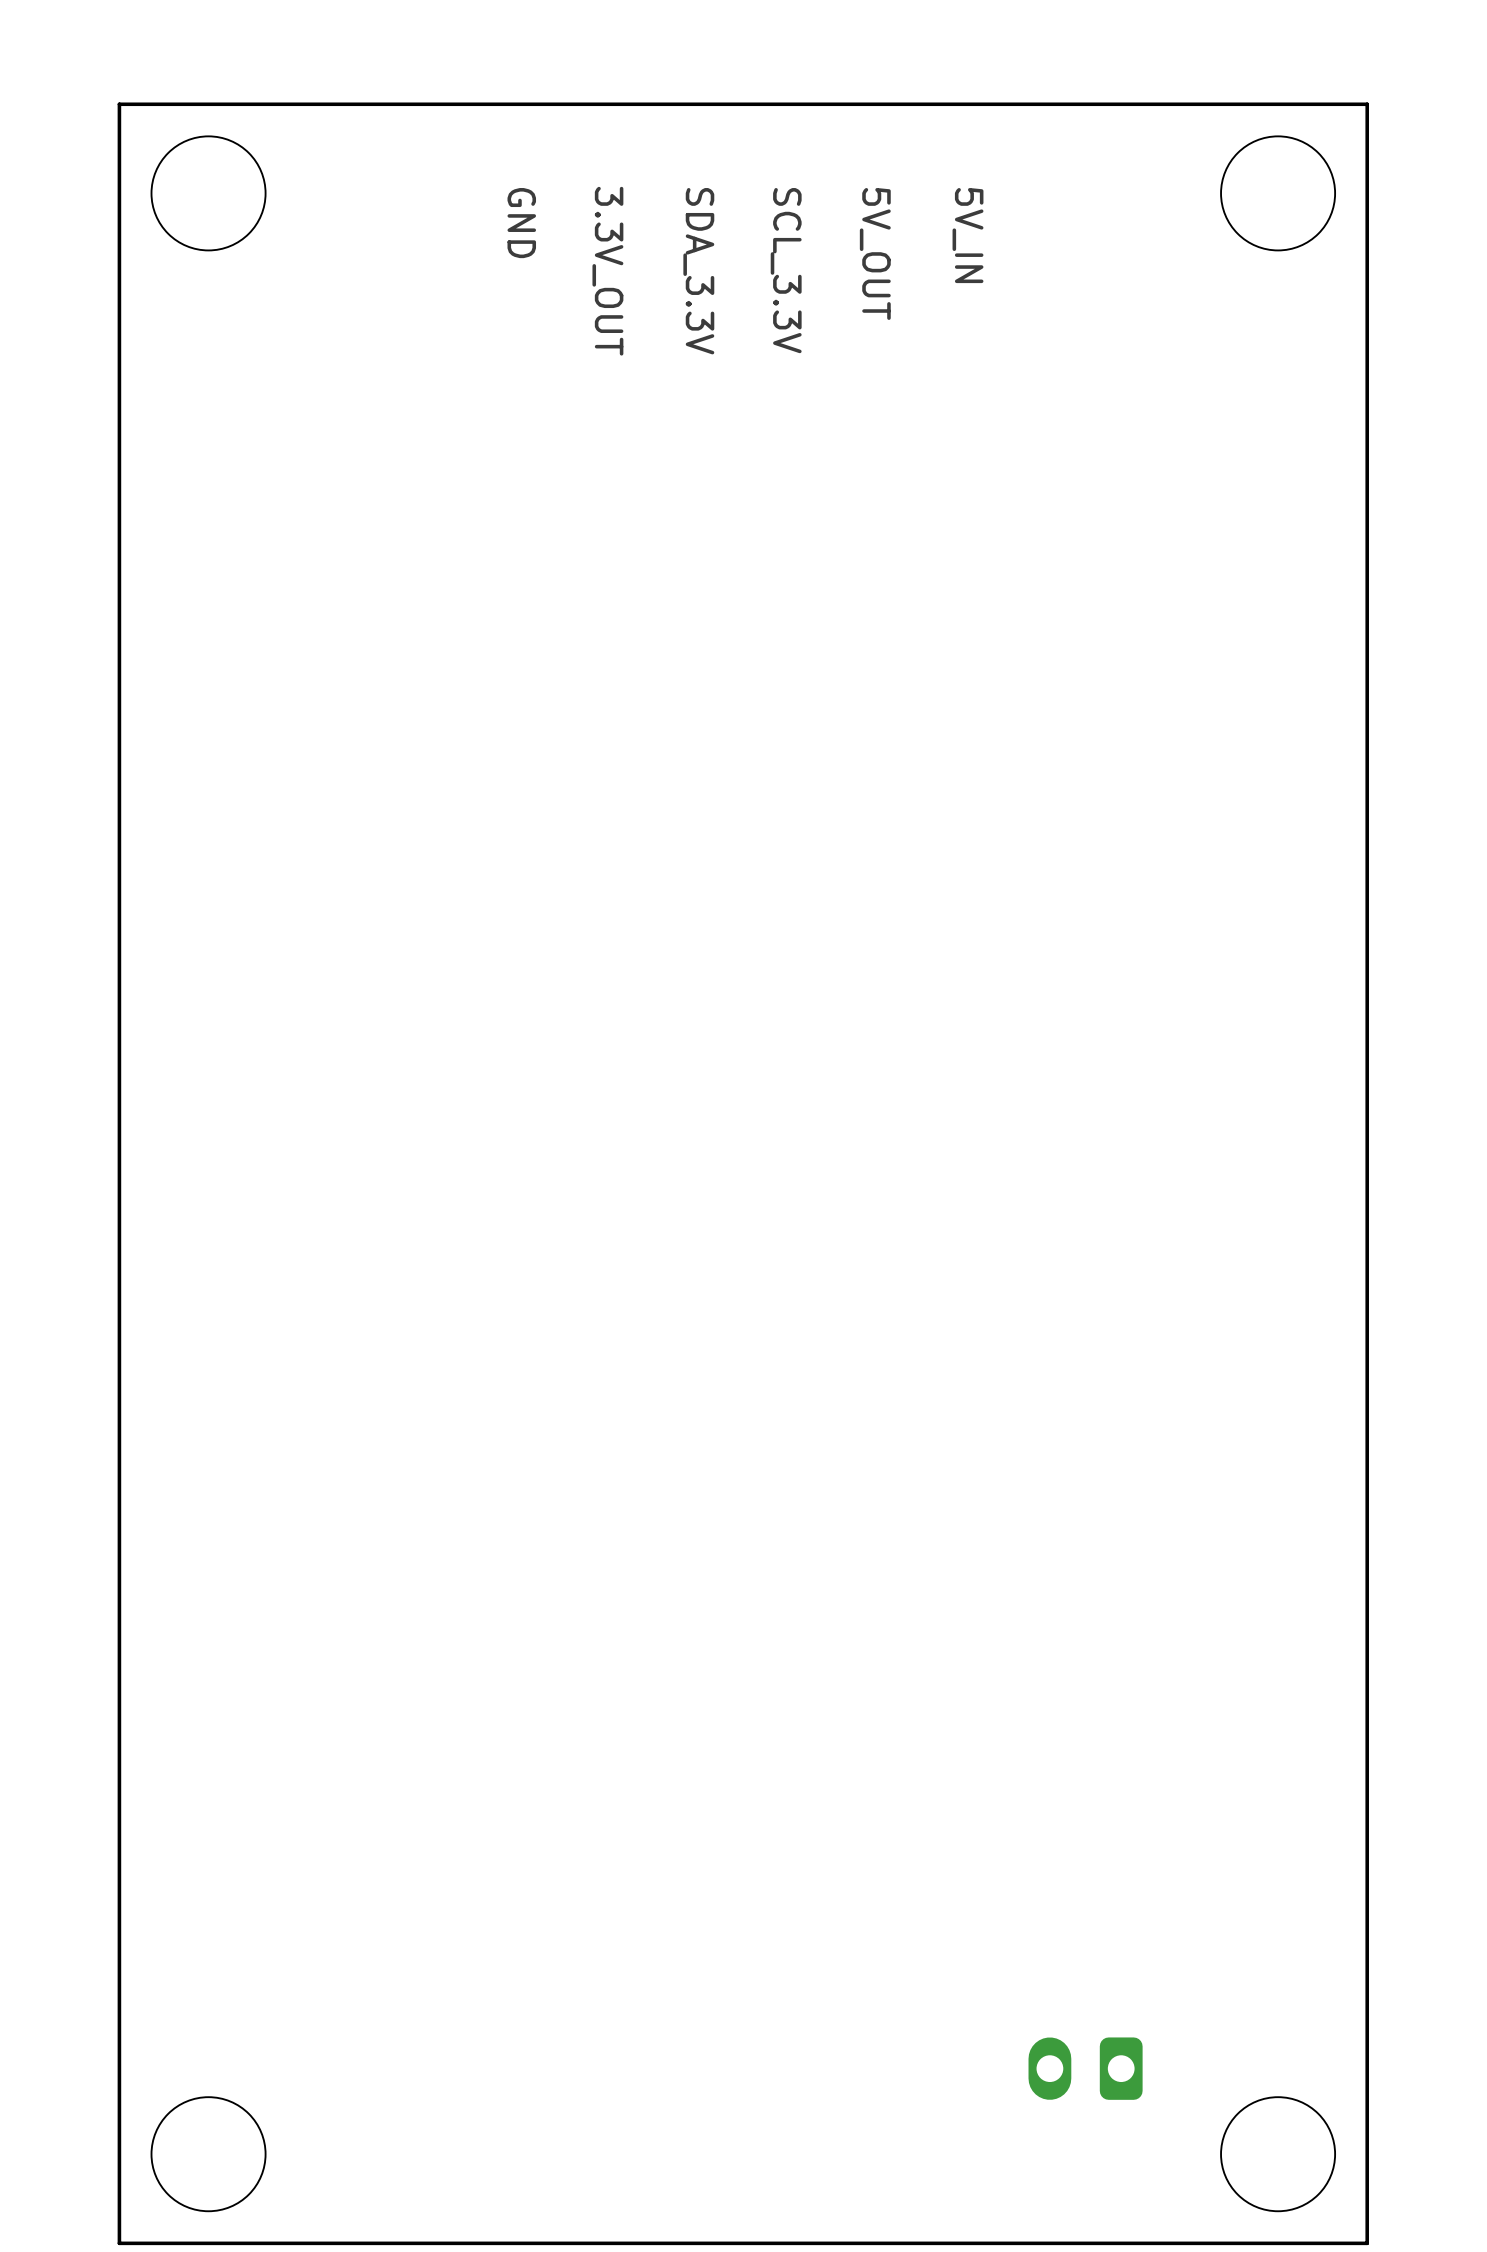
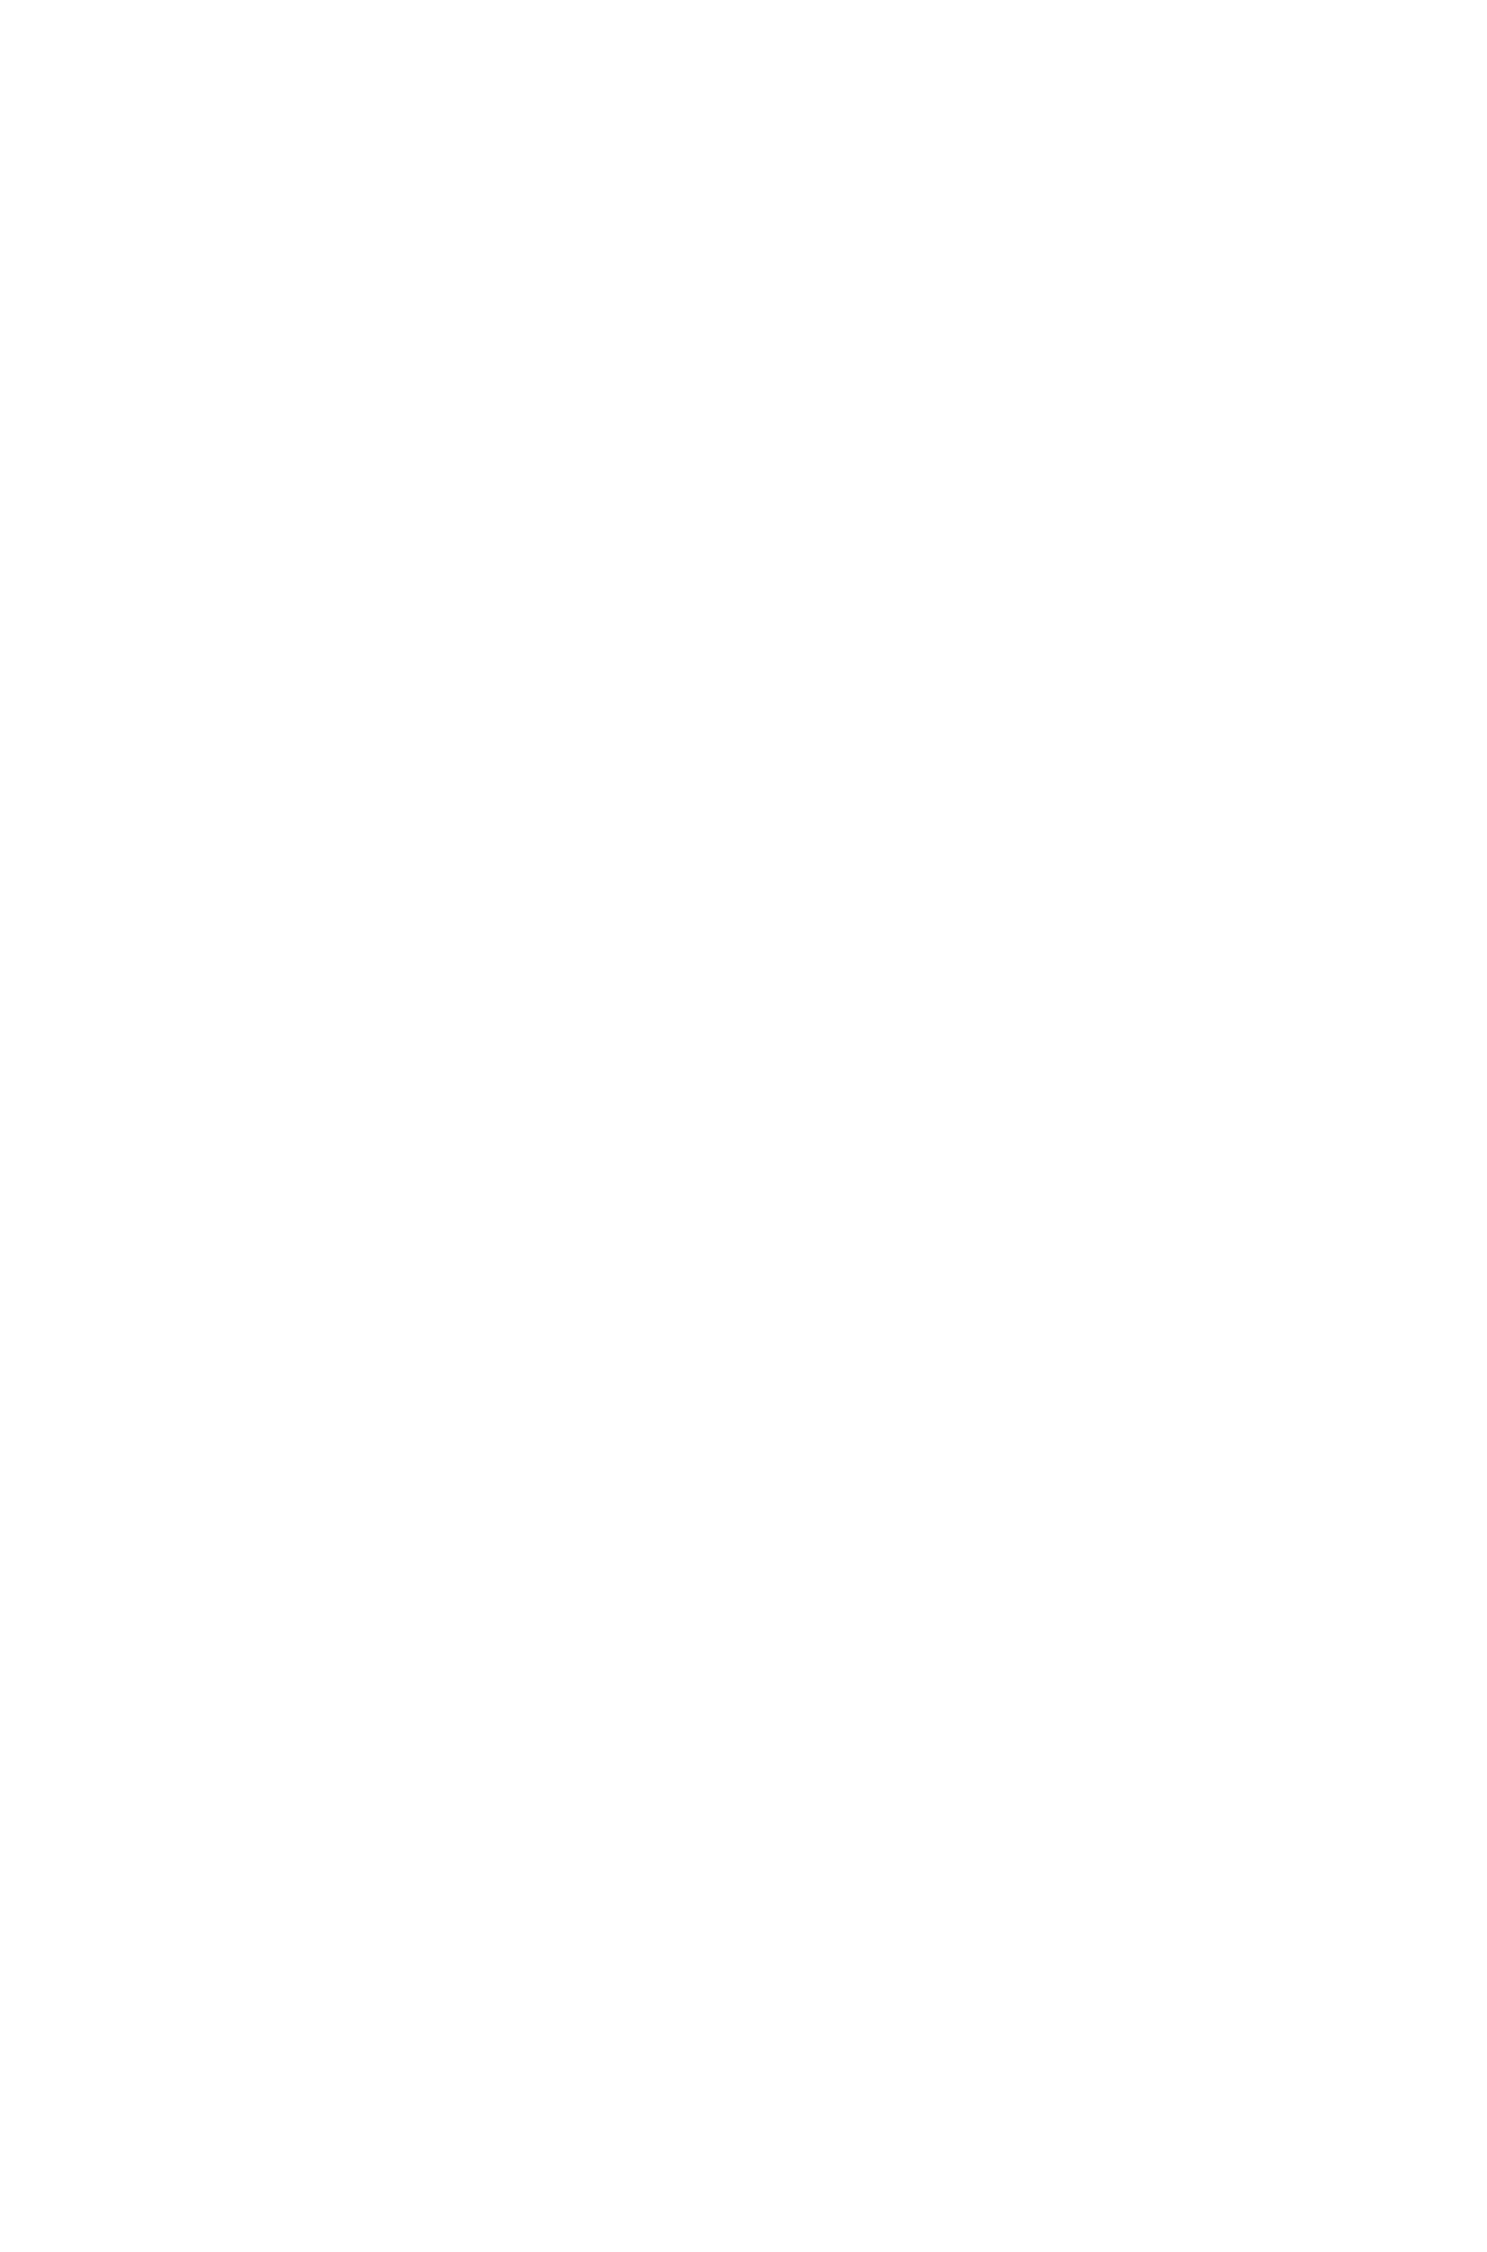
board edge: (1367, 104) (119, 104) (119, 2243) (1367, 2243) (1367, 104) -> none
round board edge: [150, 135, 267, 252] -> none
round board edge: [1220, 135, 1337, 252] -> none
text: GND (521, 223) -> none
text: 5V_IN (967, 235) -> none
text: 5V_OUT (875, 253) -> none
text: SCL_3.3V (786, 270) -> none
text: 3.3V_OUT (607, 271) -> none
text: SDA_3.3V (698, 271) -> none
part: (1085, 2068) -> none
round board edge: [150, 2096, 267, 2213] -> none
round board edge: [1220, 2096, 1337, 2213] -> none

